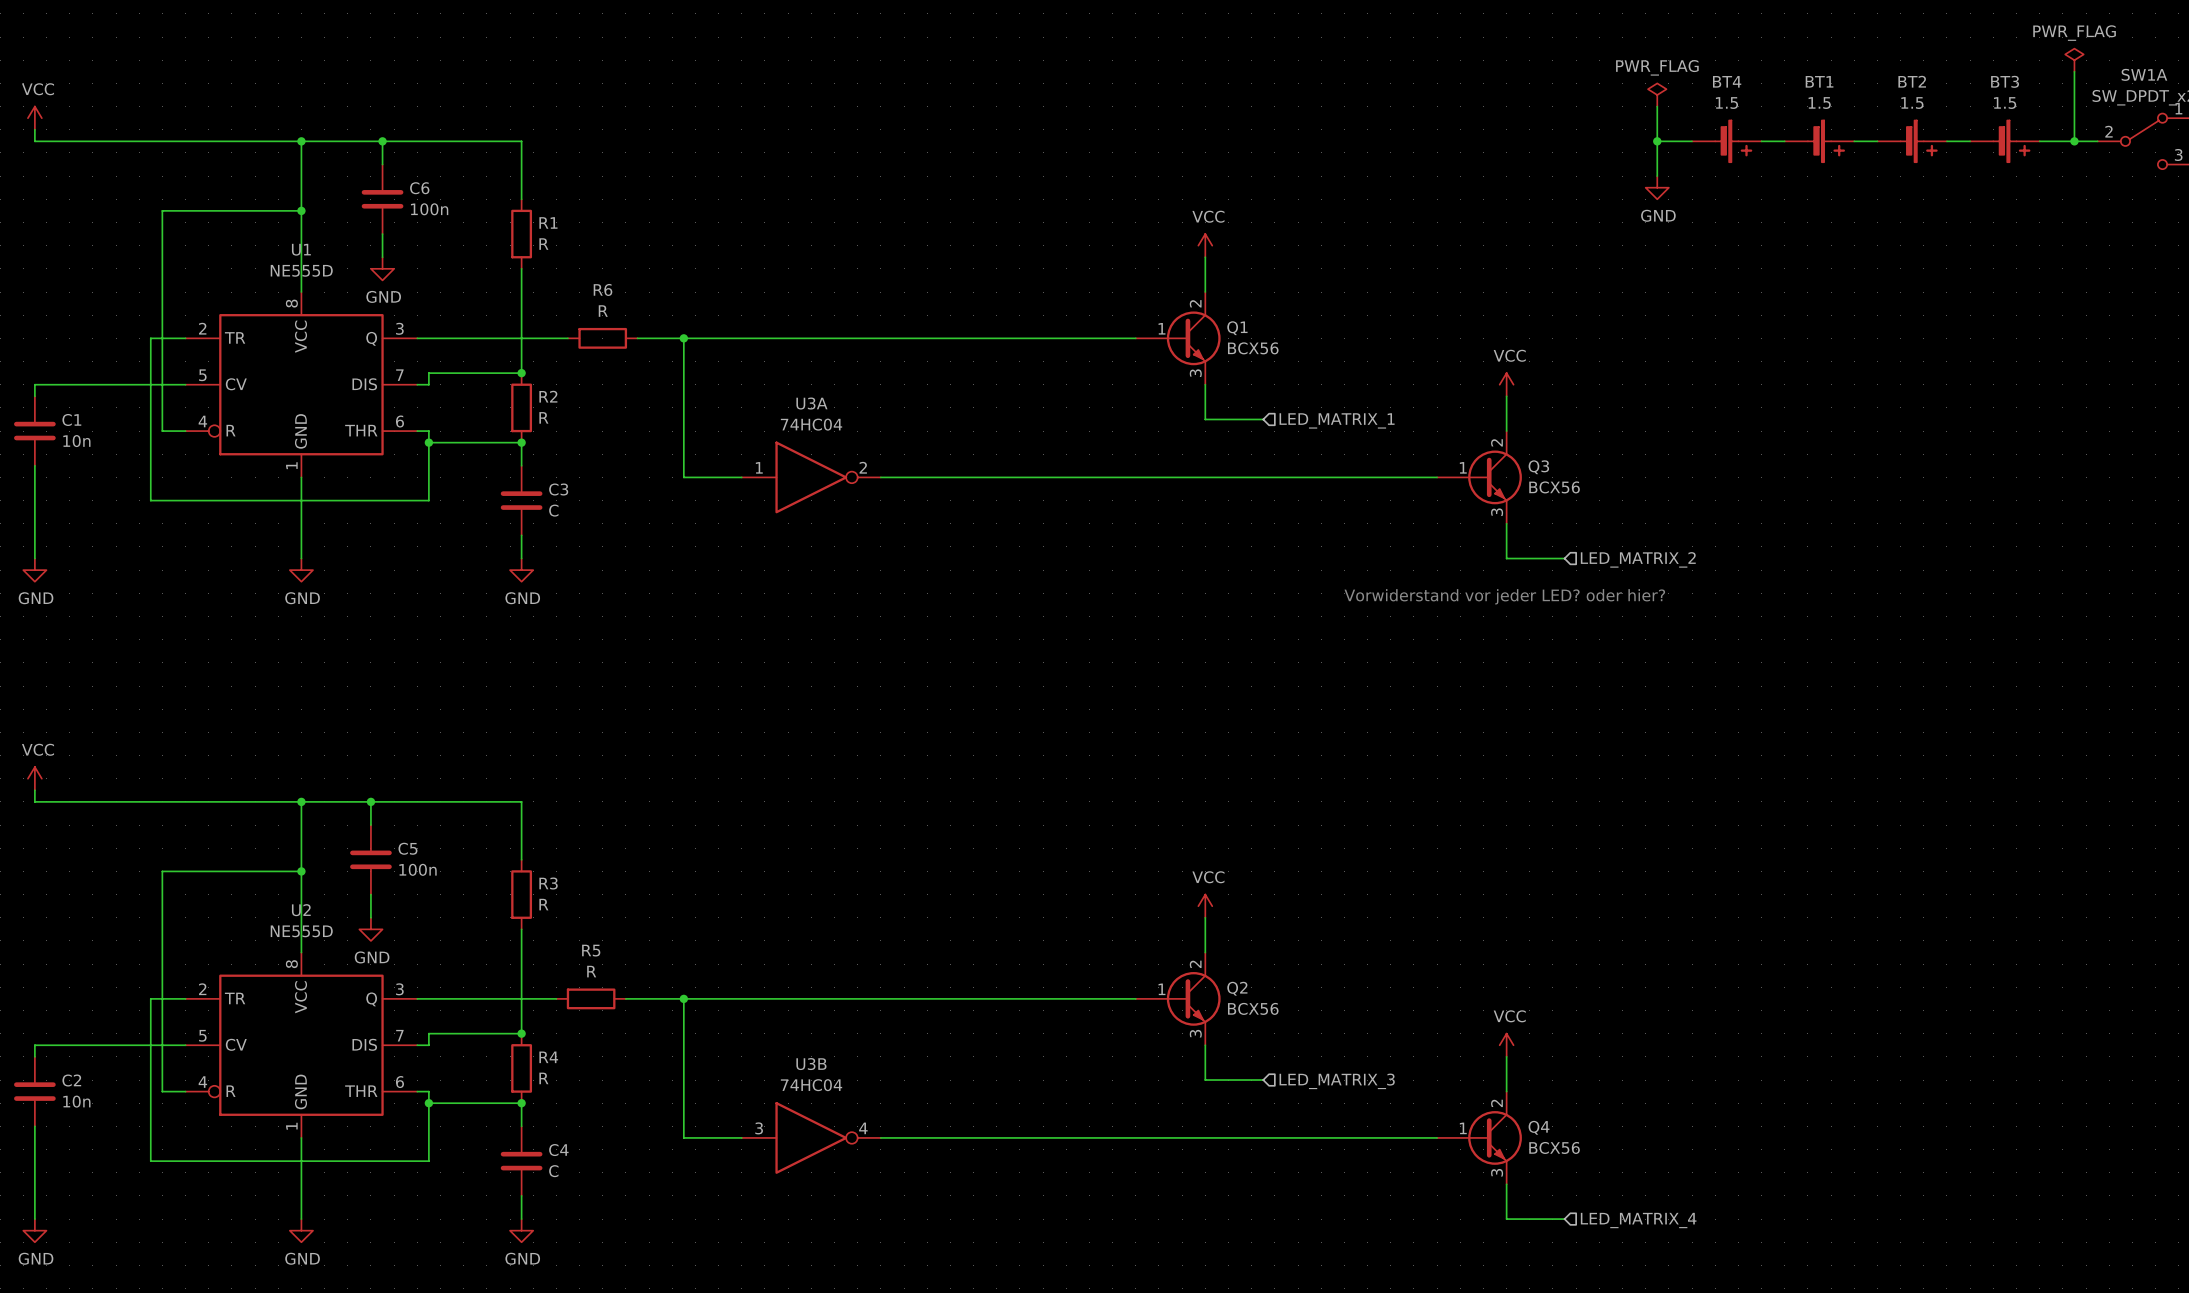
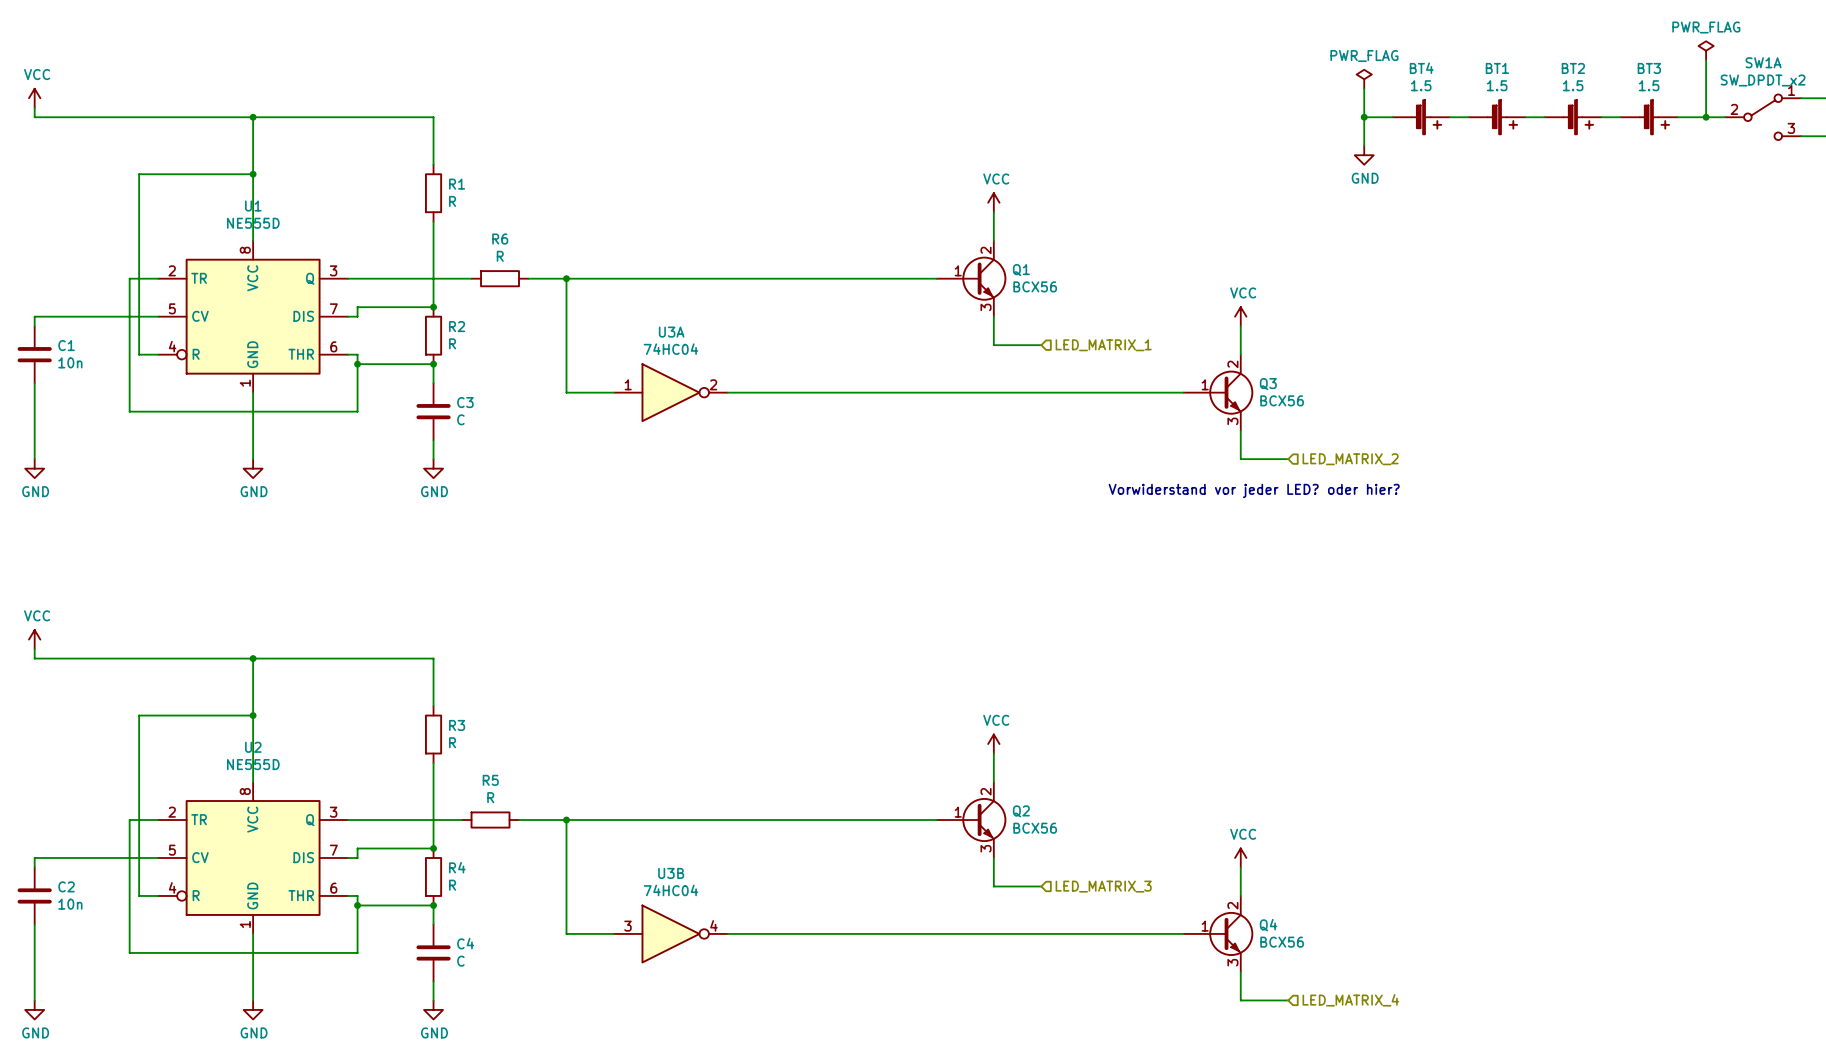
wire: (382, 141) (382, 164) -> none
junction: (382, 141) -> none
C6: 100n (382, 199) -> none
wire: (382, 234) (382, 257) -> none
power symbol: GND (382, 268) -> none
wire: (370, 801) (370, 825) -> none
junction: (370, 801) -> none
C5: 100n (370, 859) -> none
wire: (370, 894) (370, 917) -> none
power symbol: GND (370, 929) -> none

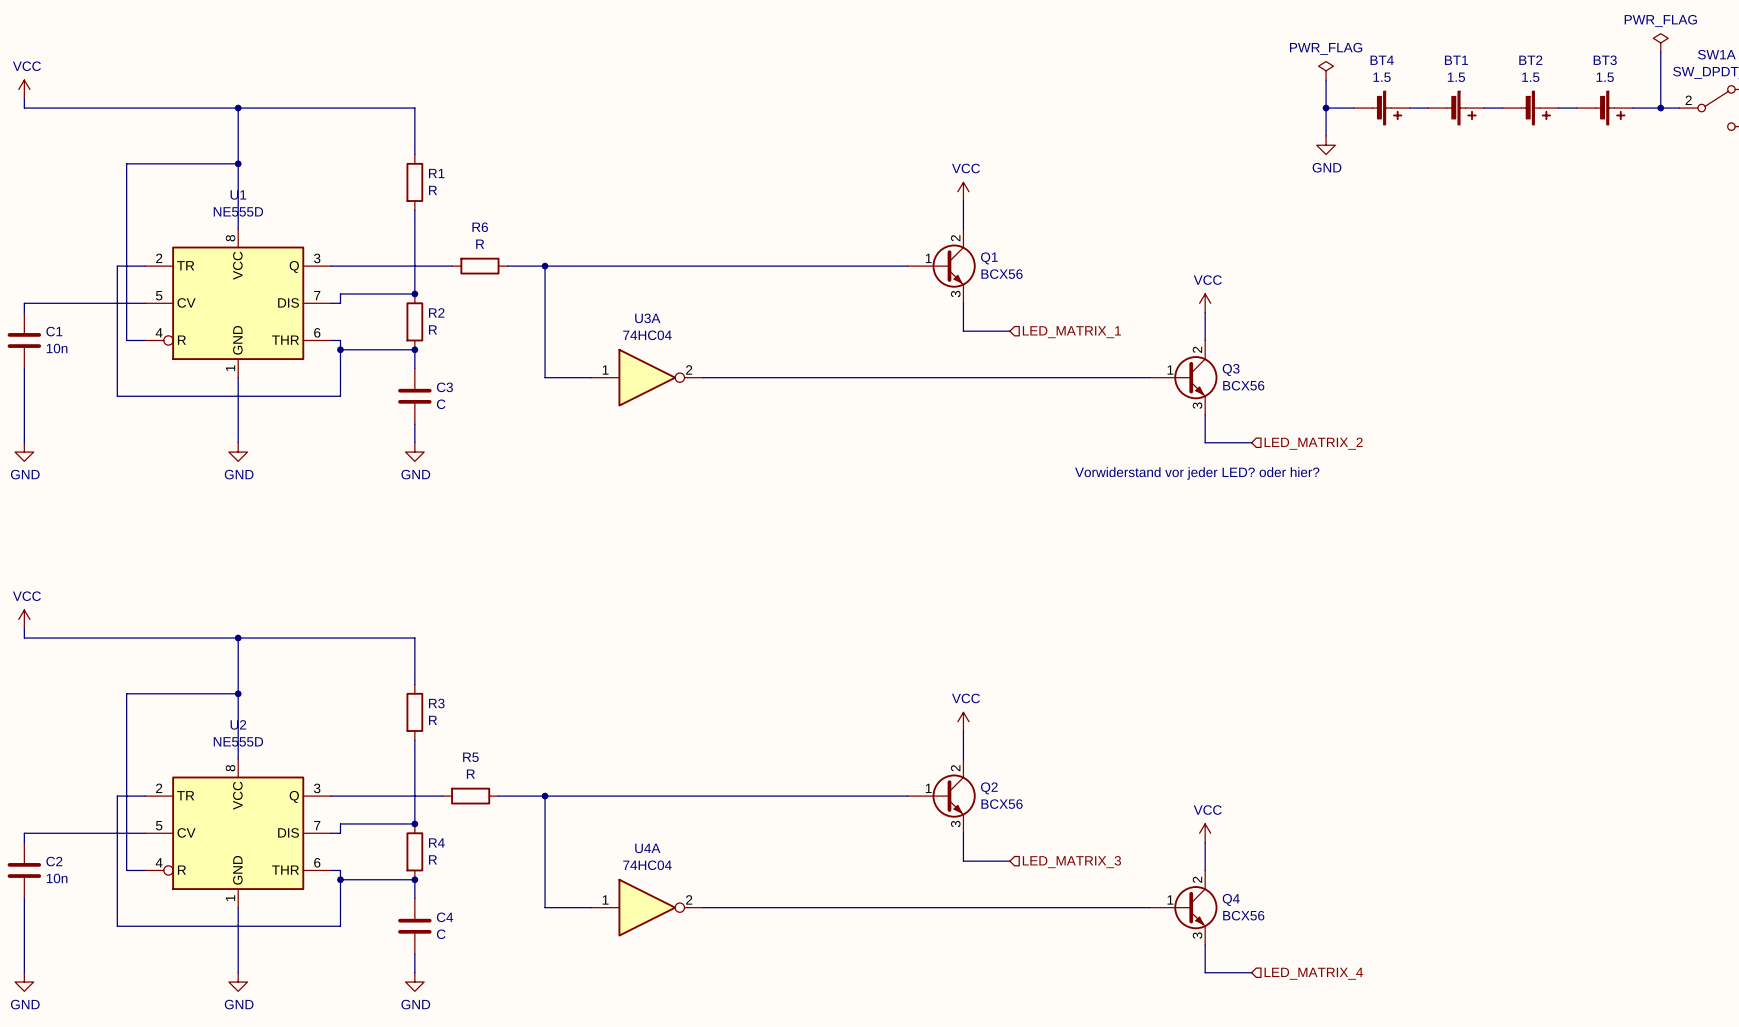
U3B name: U3B (671, 873) -> U4A (647, 848)
U3B pin number: 4 (713, 925) -> 2 (689, 899)
U3B pin number: 3 (628, 926) -> 1 (605, 899)

